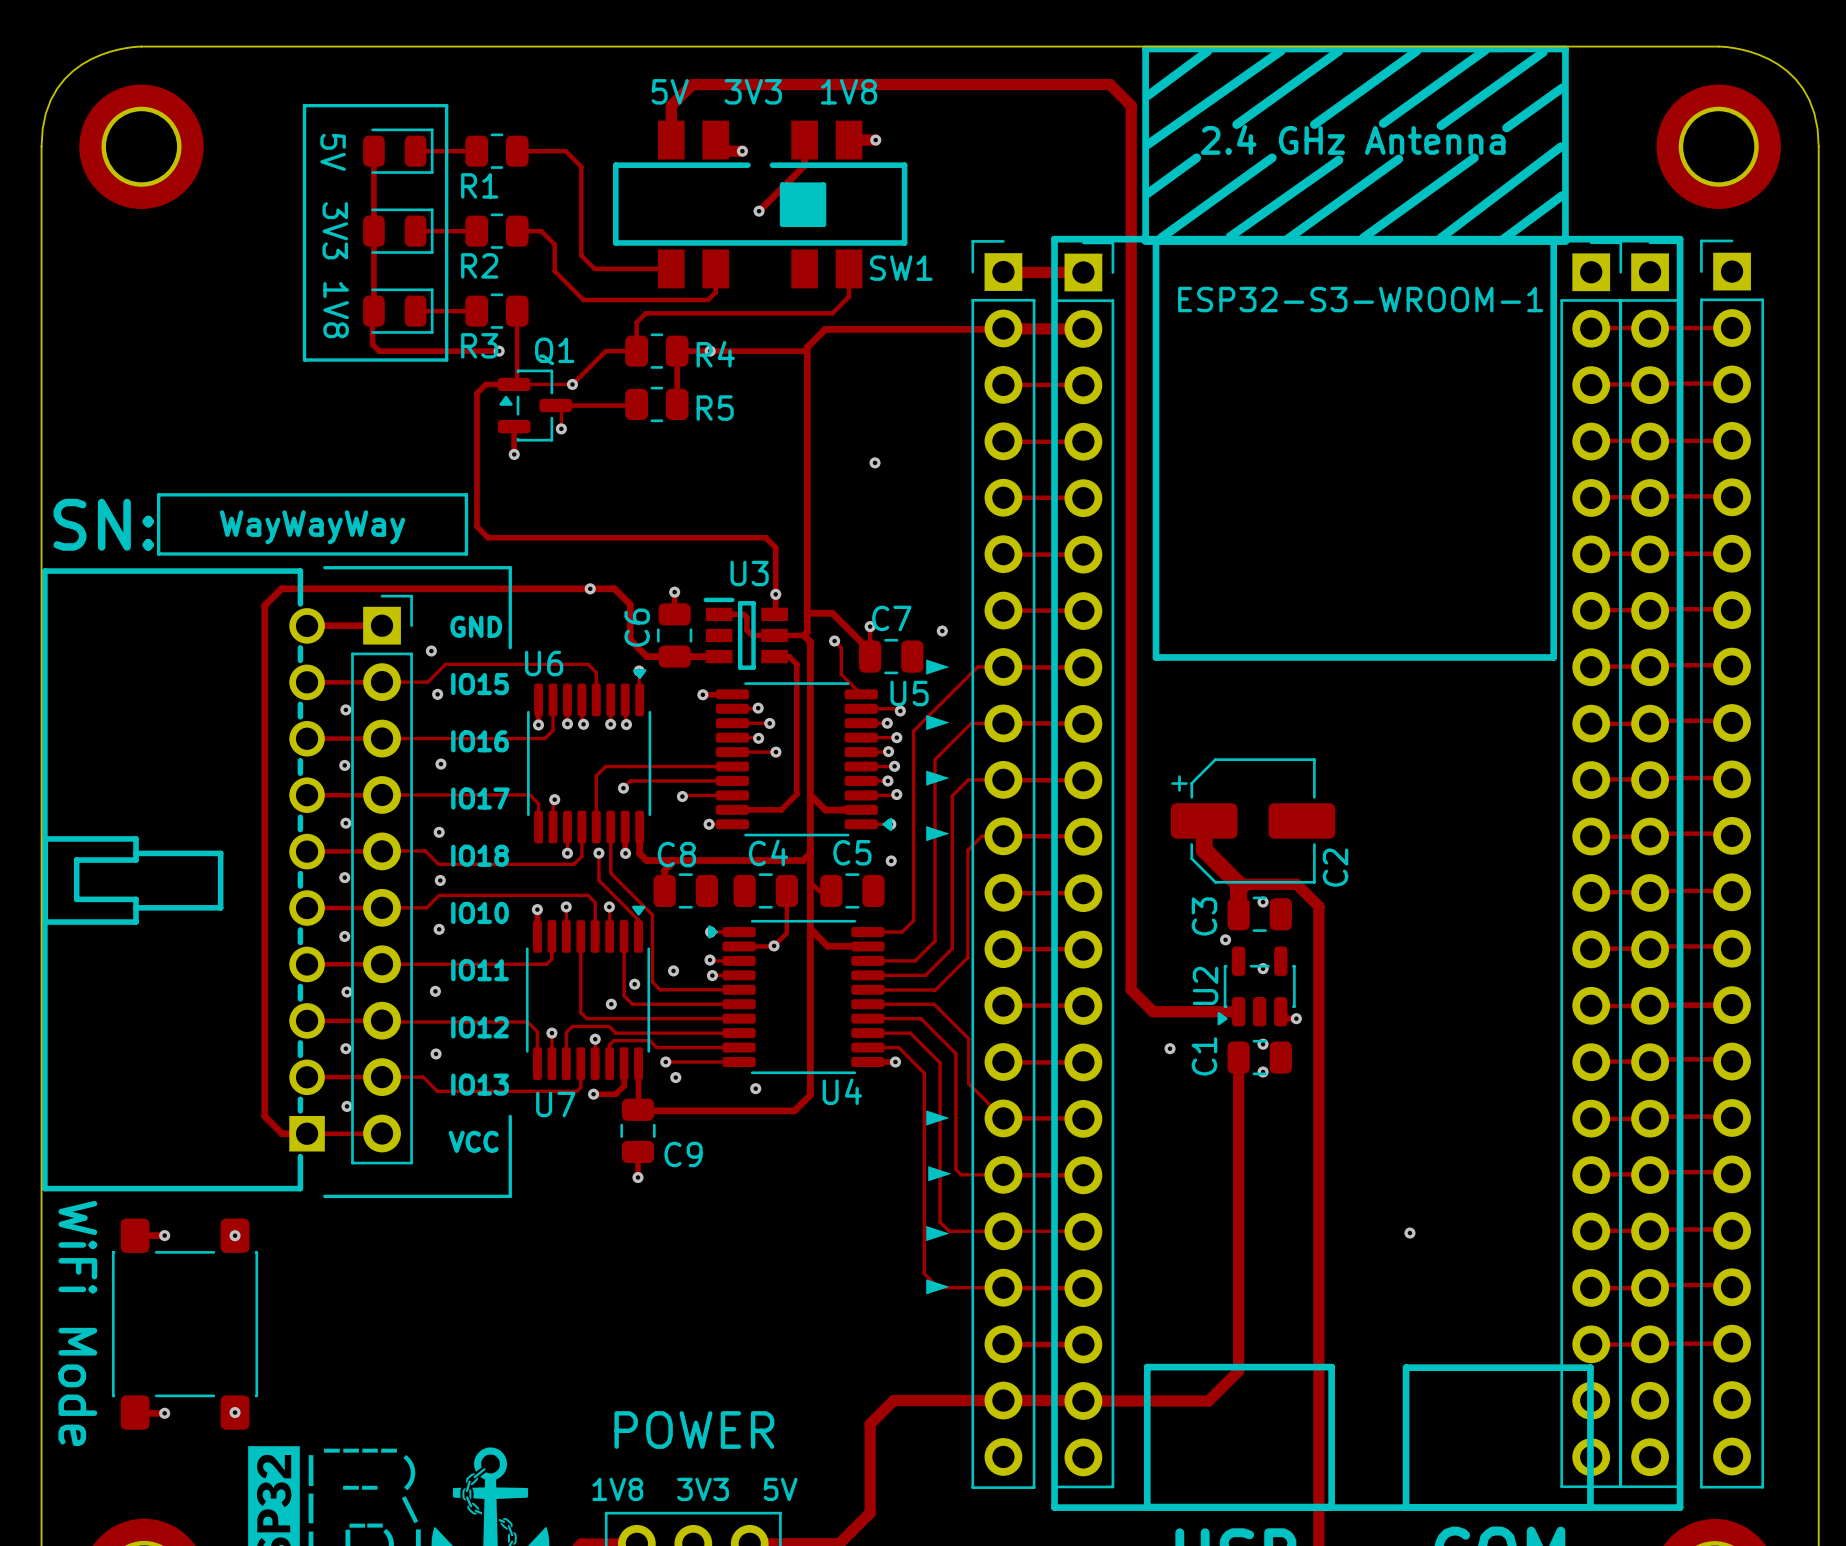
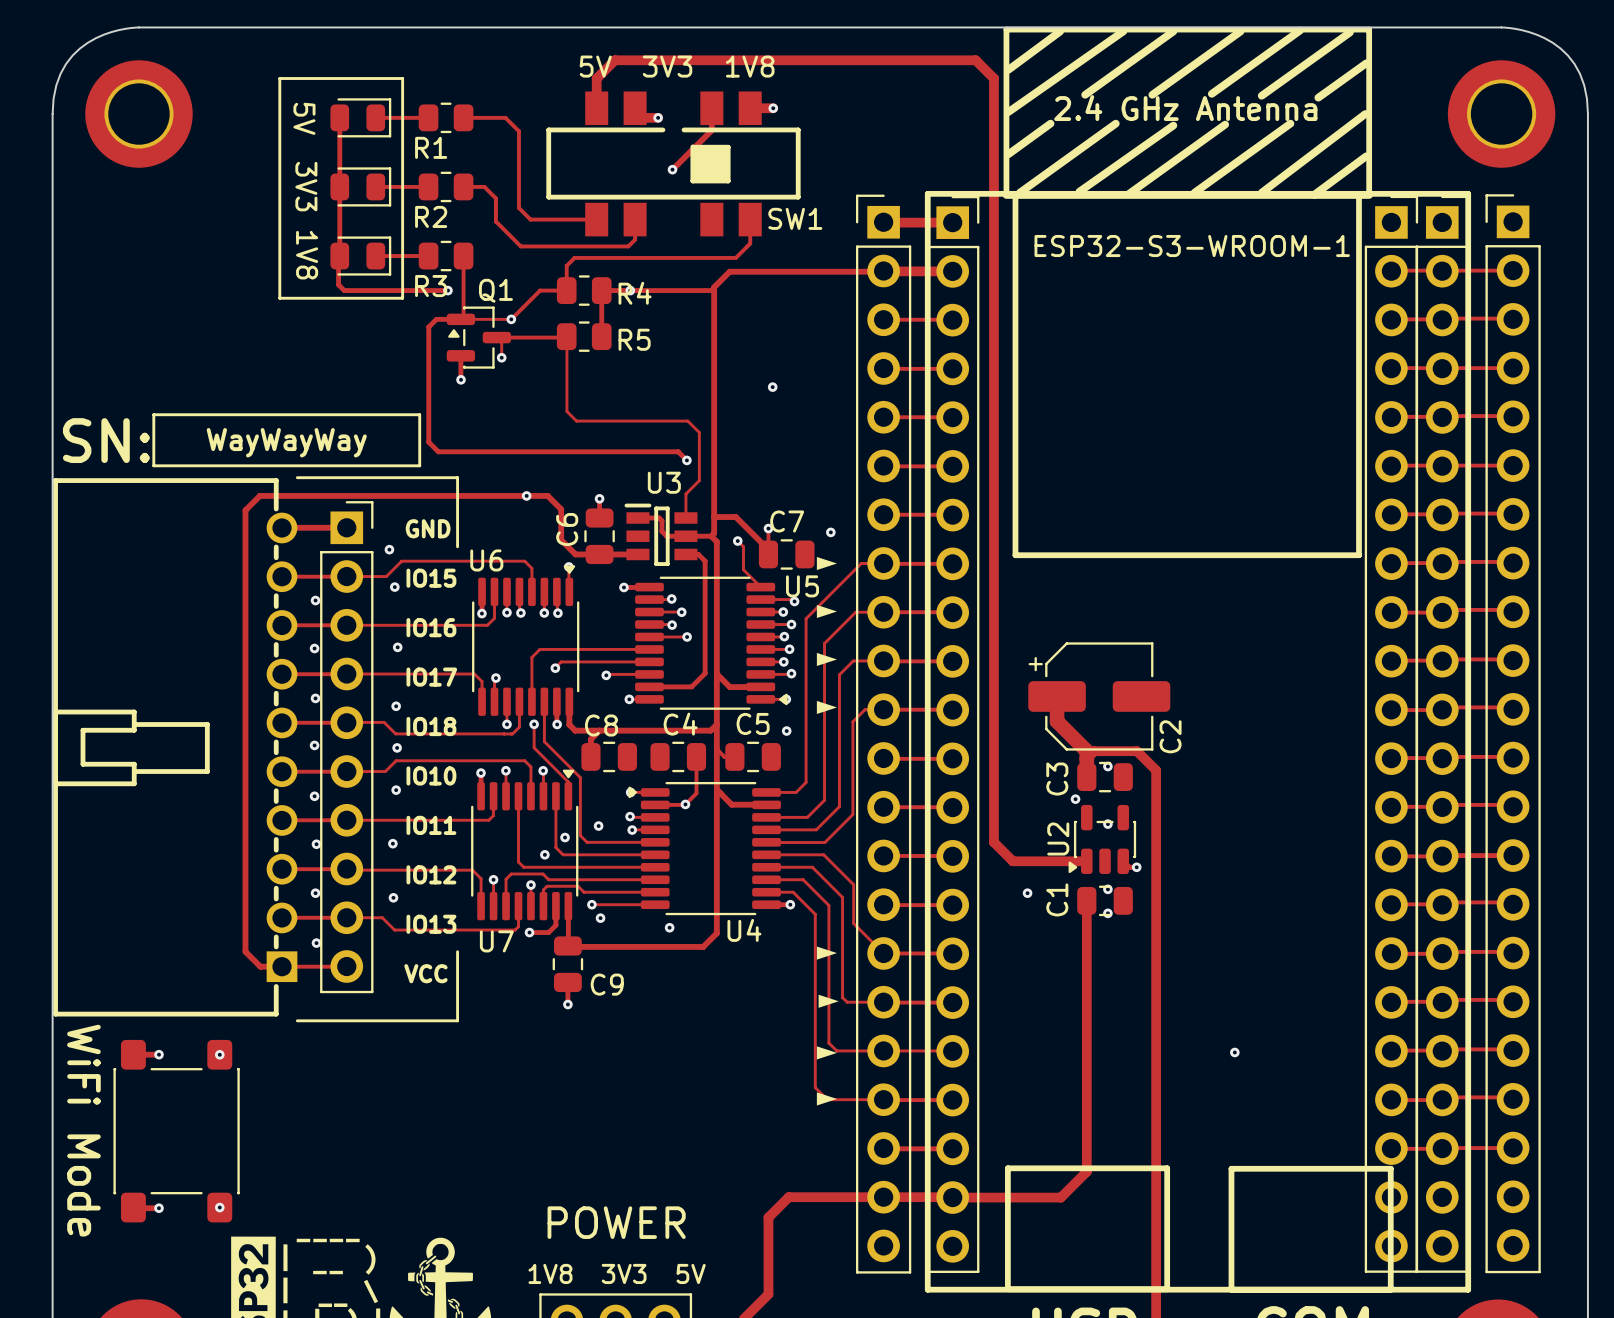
track: none -> (566, 336) (566, 411) (576, 421) (687, 421) (699, 432) (699, 480) (685, 494) (685, 518)
track: (775, 547) (775, 613) -> none
via position: (775, 594) -> (686, 460)

